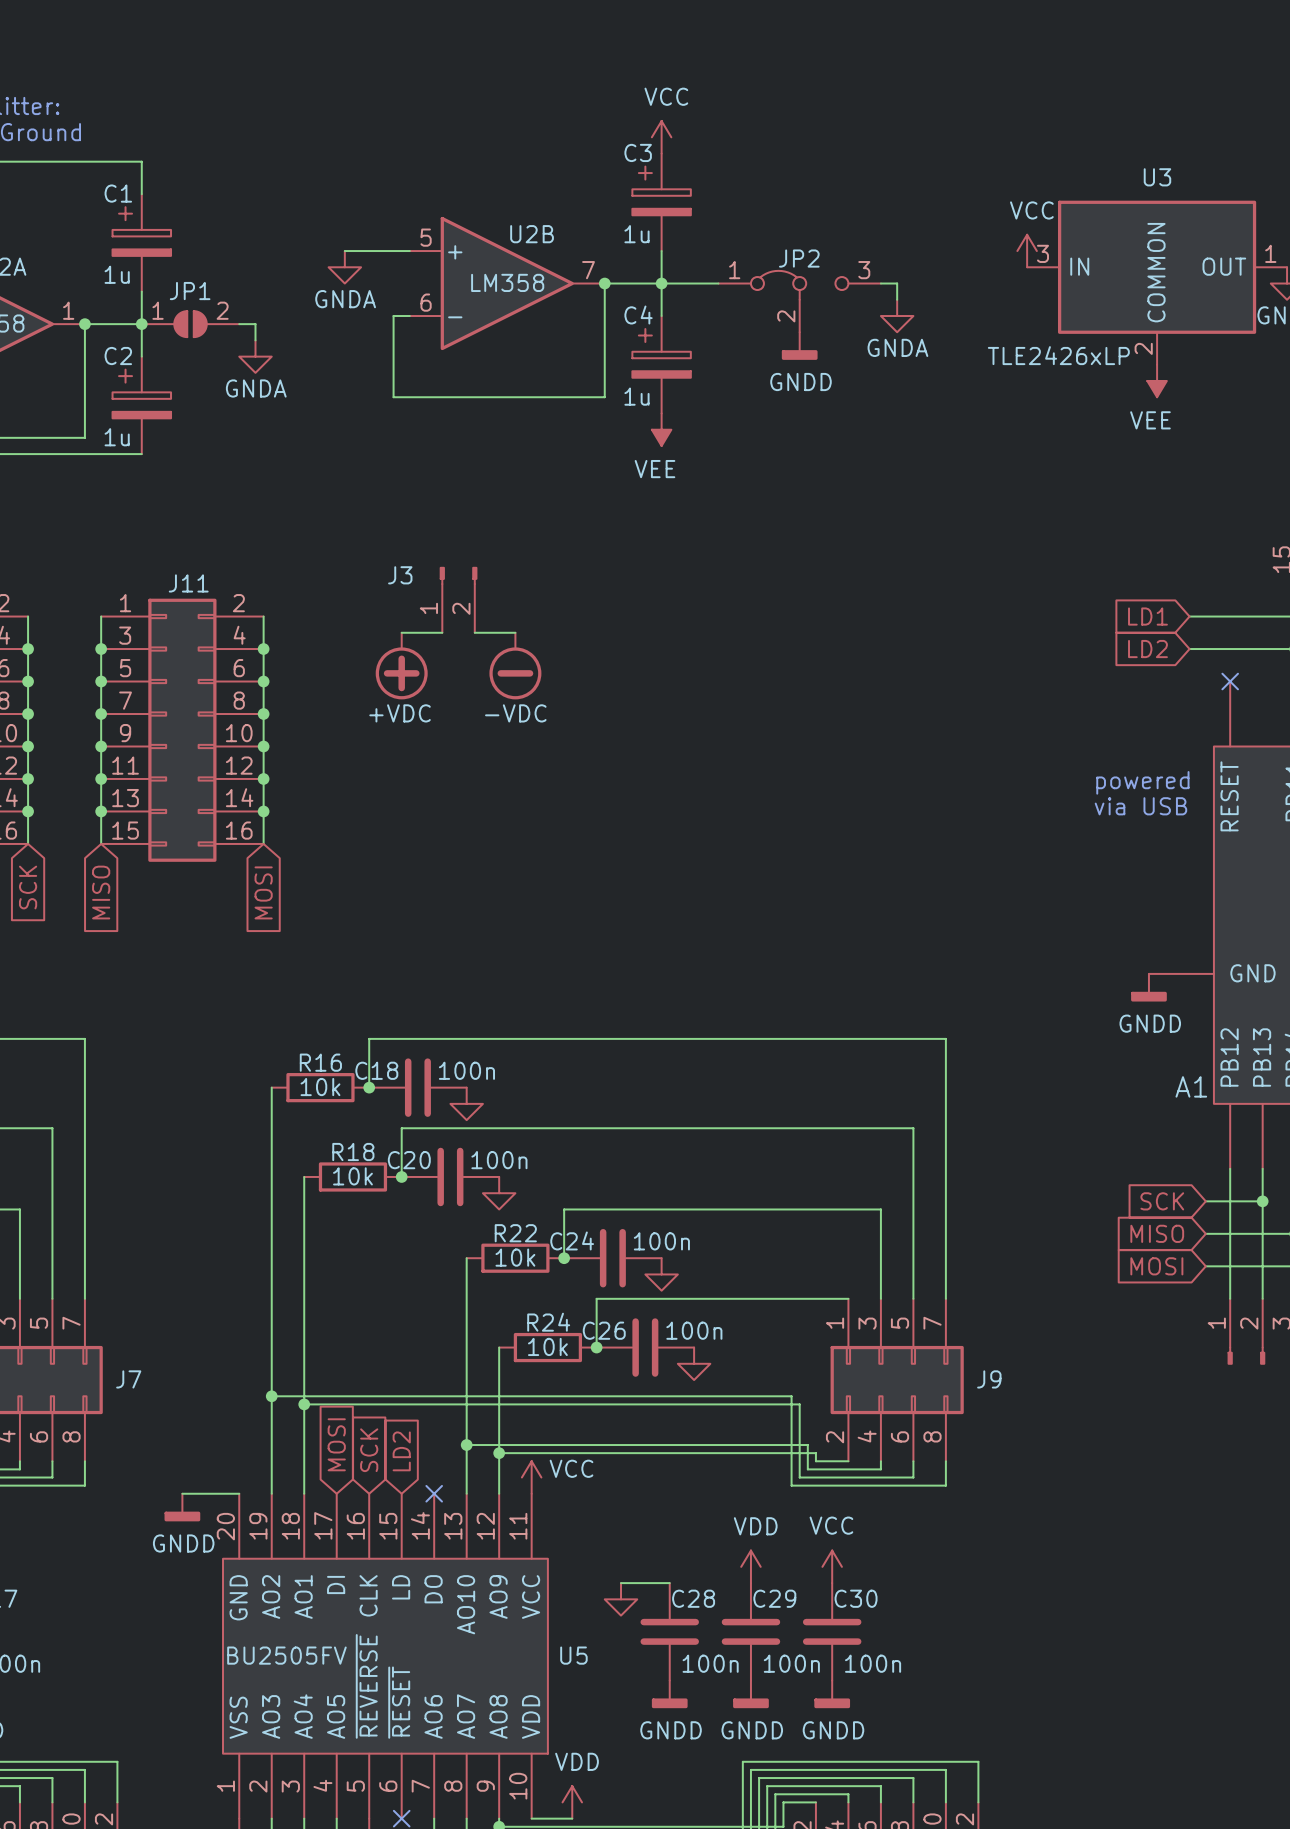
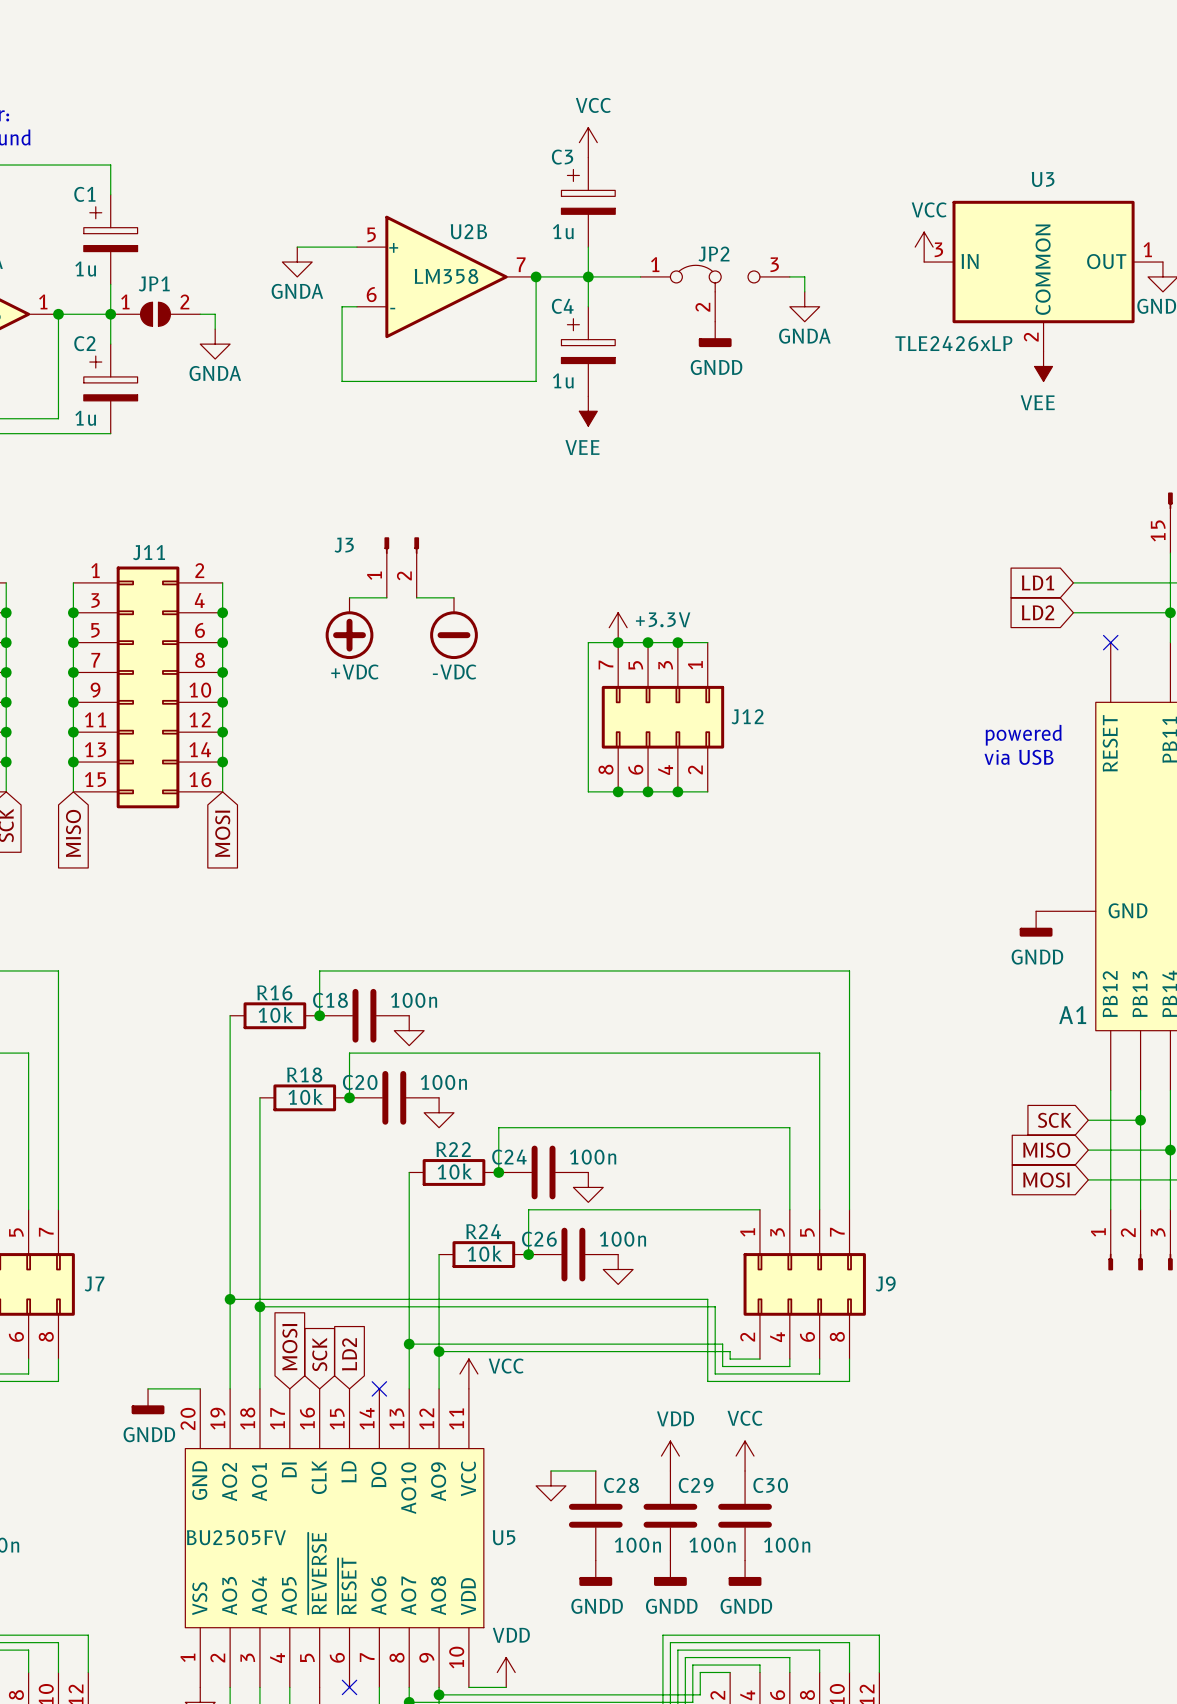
power symbol: none -> +3.3V (618, 627)
junction: none -> (618, 642)
junction: none -> (648, 642)
junction: none -> (677, 642)
wire: none -> (707, 642) (588, 642) (588, 791) (707, 791)
J12: none -> (662, 717)
junction: none -> (618, 791)
junction: none -> (648, 791)
junction: none -> (677, 791)

